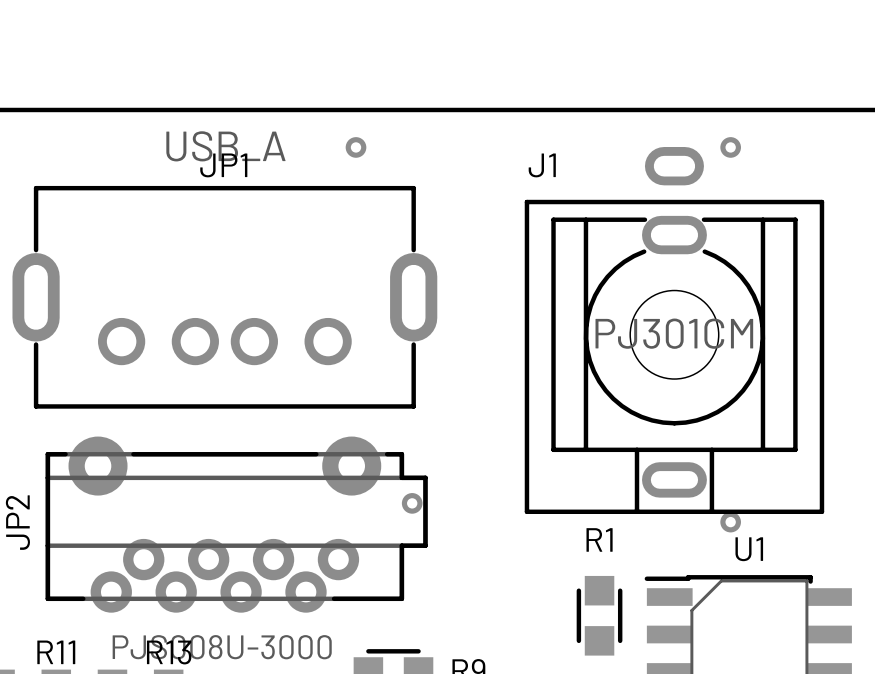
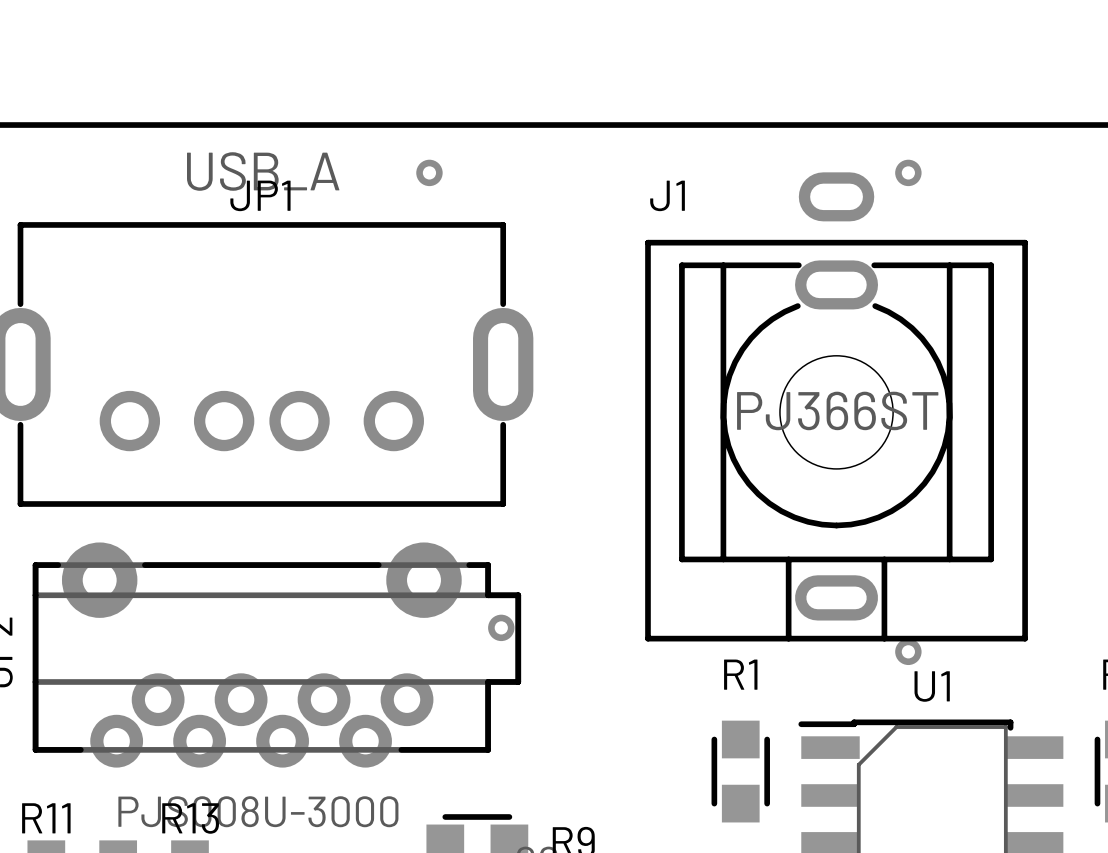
J1 value: PJ301CM (674, 333) -> PJ366ST (837, 410)

